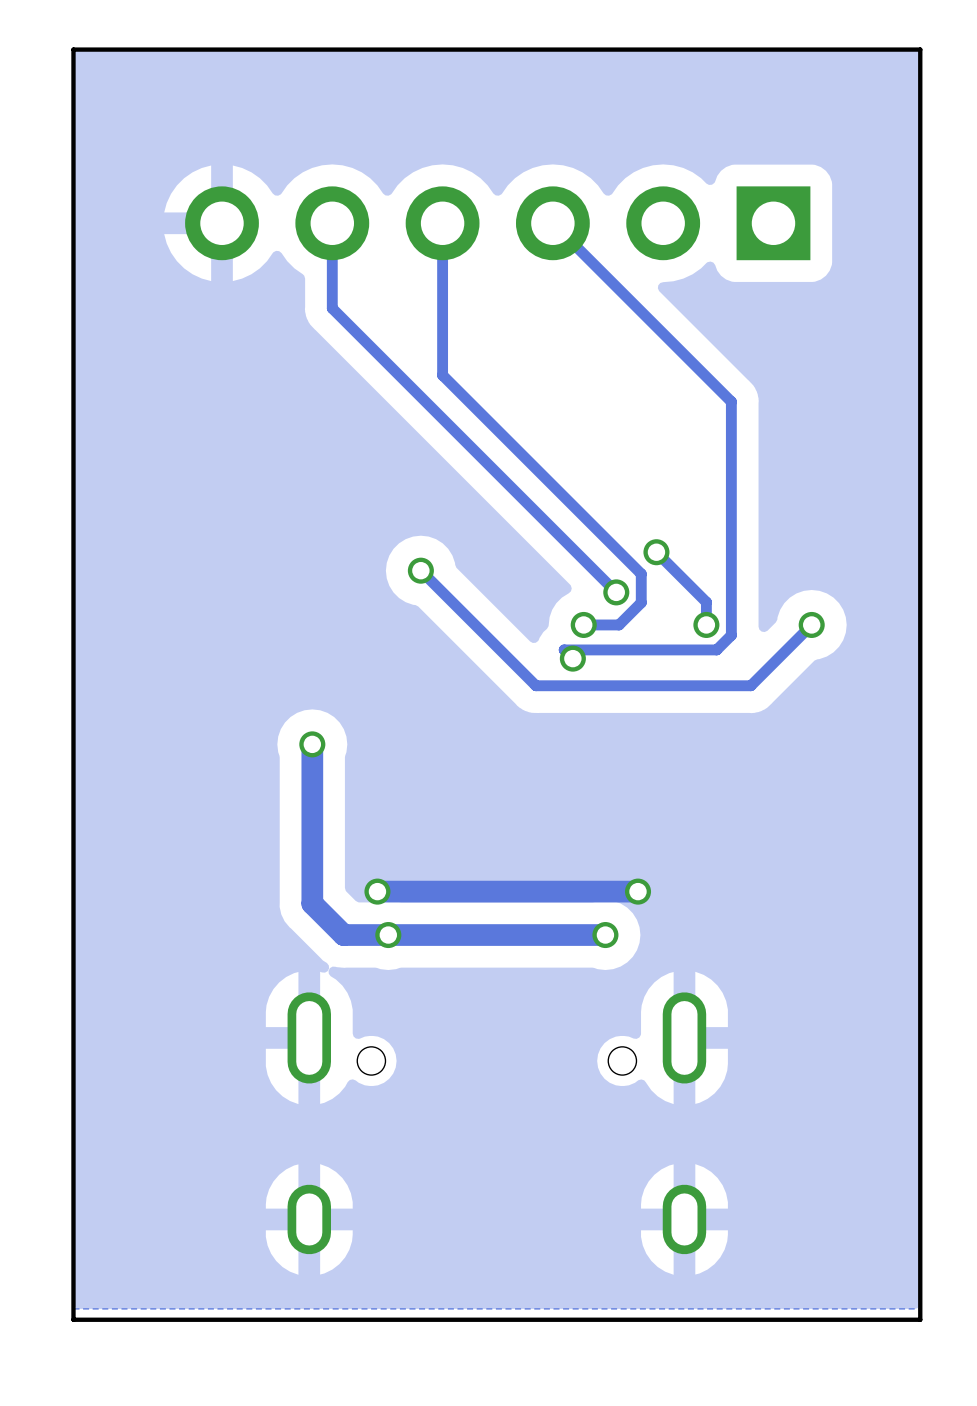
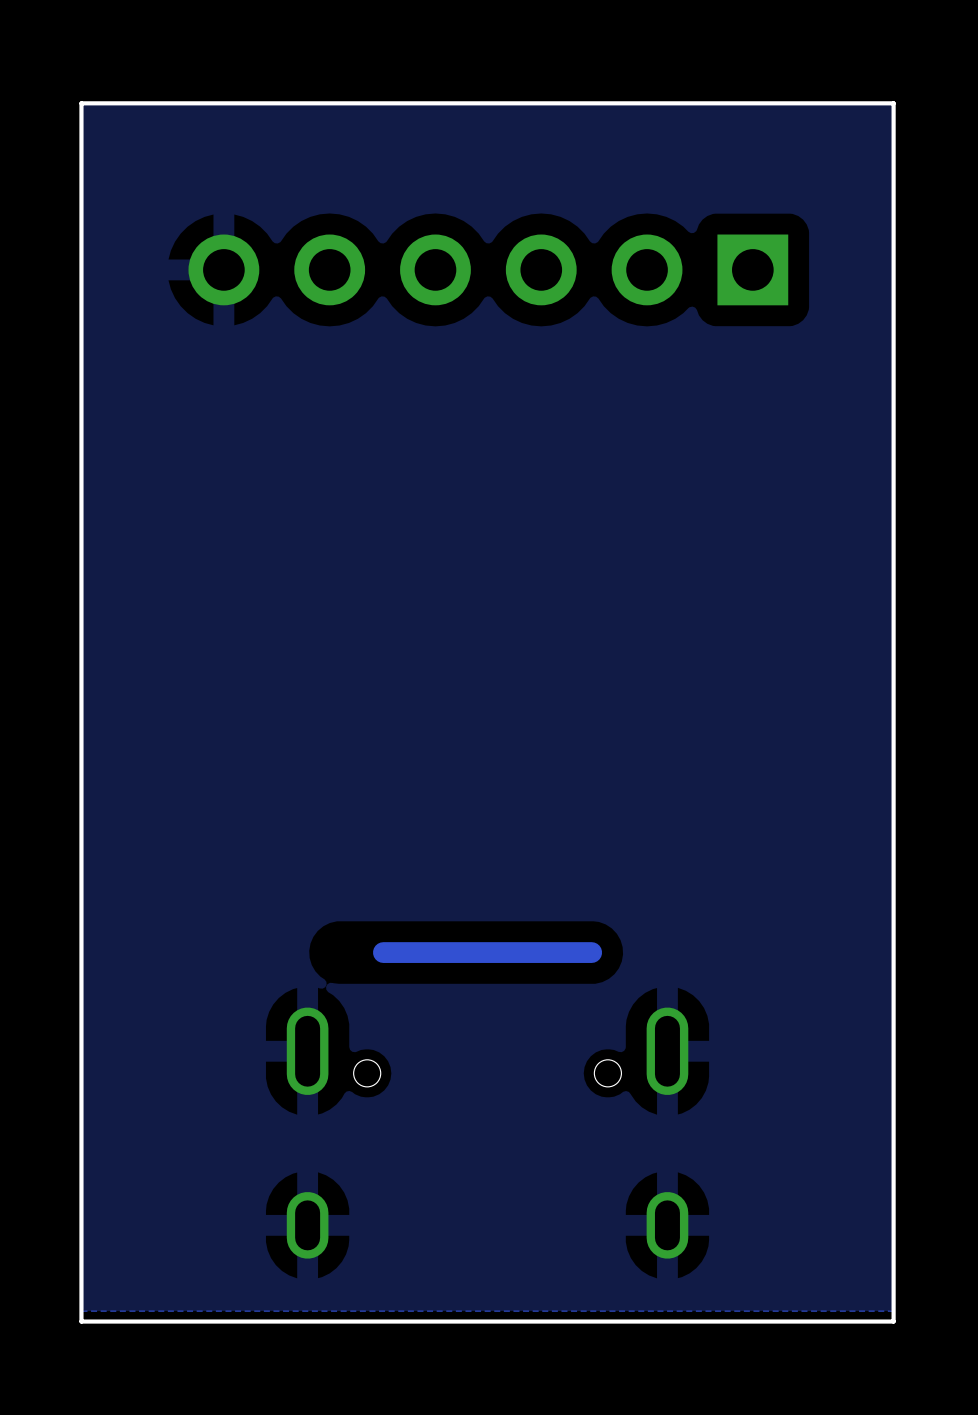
track: (332, 223) (332, 308) (616, 592) -> none
track: (442, 223) (442, 375) (641, 573) (641, 602) (619, 624) (583, 624) -> none
track: (552, 223) (731, 401) (731, 635) (716, 649) (564, 649) (572, 658) -> none
track: (656, 552) (706, 602) (706, 624) -> none
via: (656, 552) -> none
track: (420, 570) (535, 685) (750, 685) (811, 624) -> none
via: (420, 570) -> none
via: (616, 592) -> none
via: (583, 624) -> none
via: (706, 624) -> none
via: (811, 624) -> none
via: (572, 658) -> none
track: (312, 744) (312, 903) (343, 935) (388, 935) -> none
via: (312, 744) -> none
via: (377, 891) -> none
track: (638, 891) (377, 891) -> none
via: (638, 891) -> none
via: (388, 935) -> none
via: (605, 935) -> none

